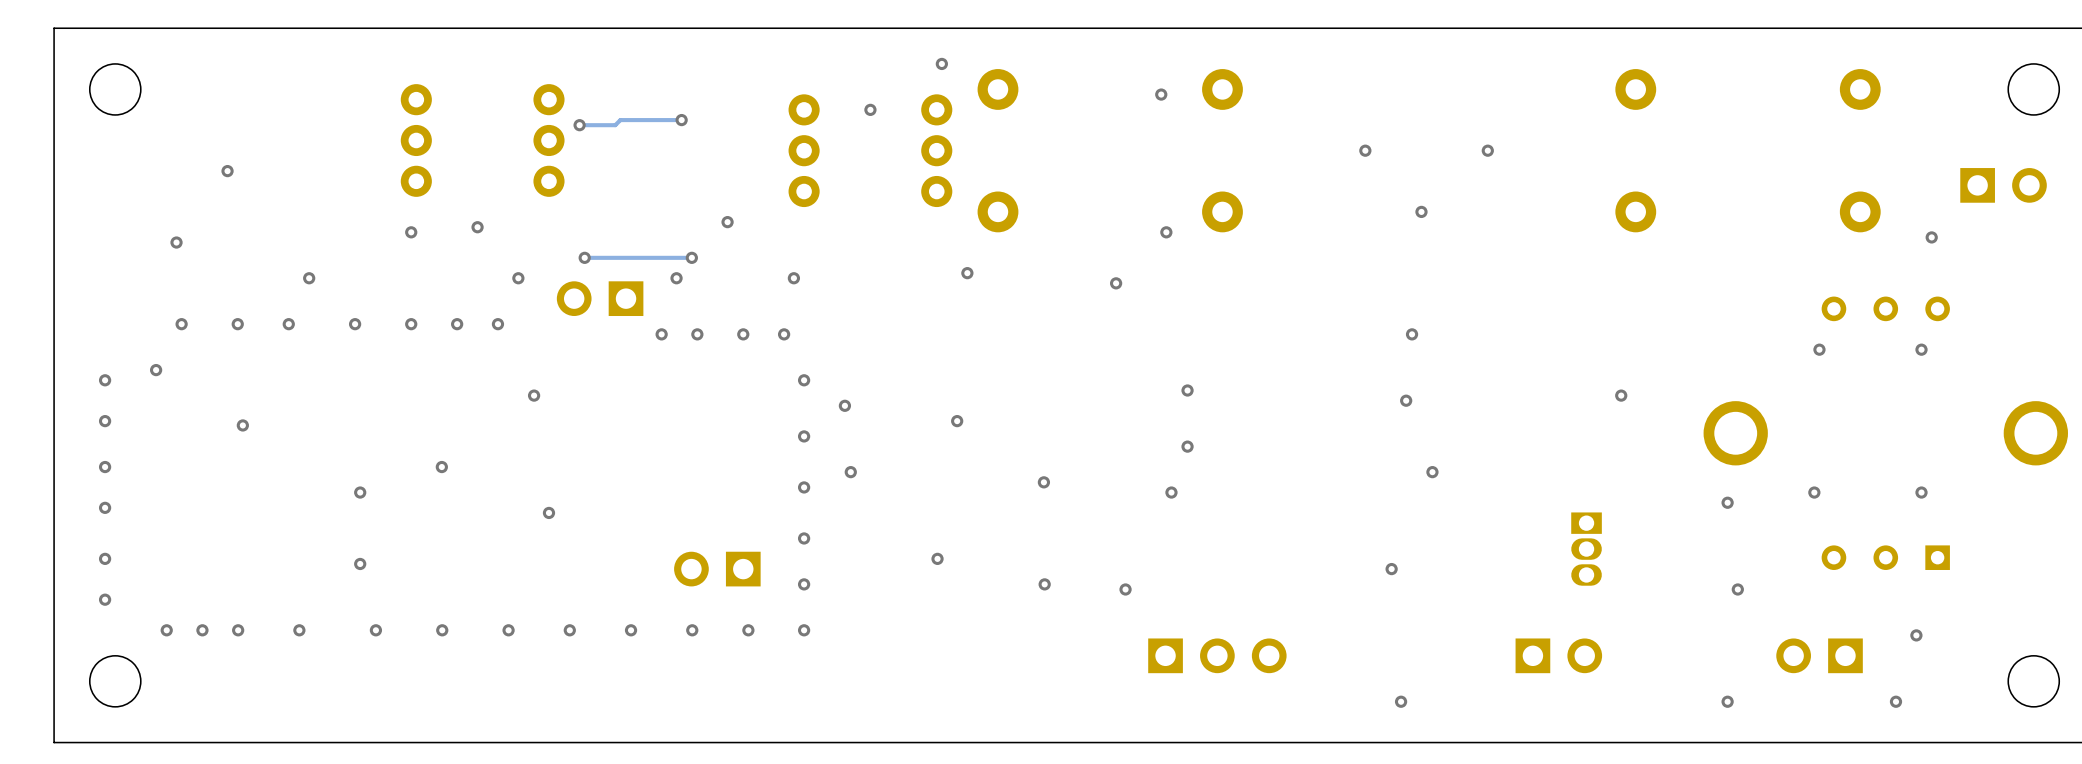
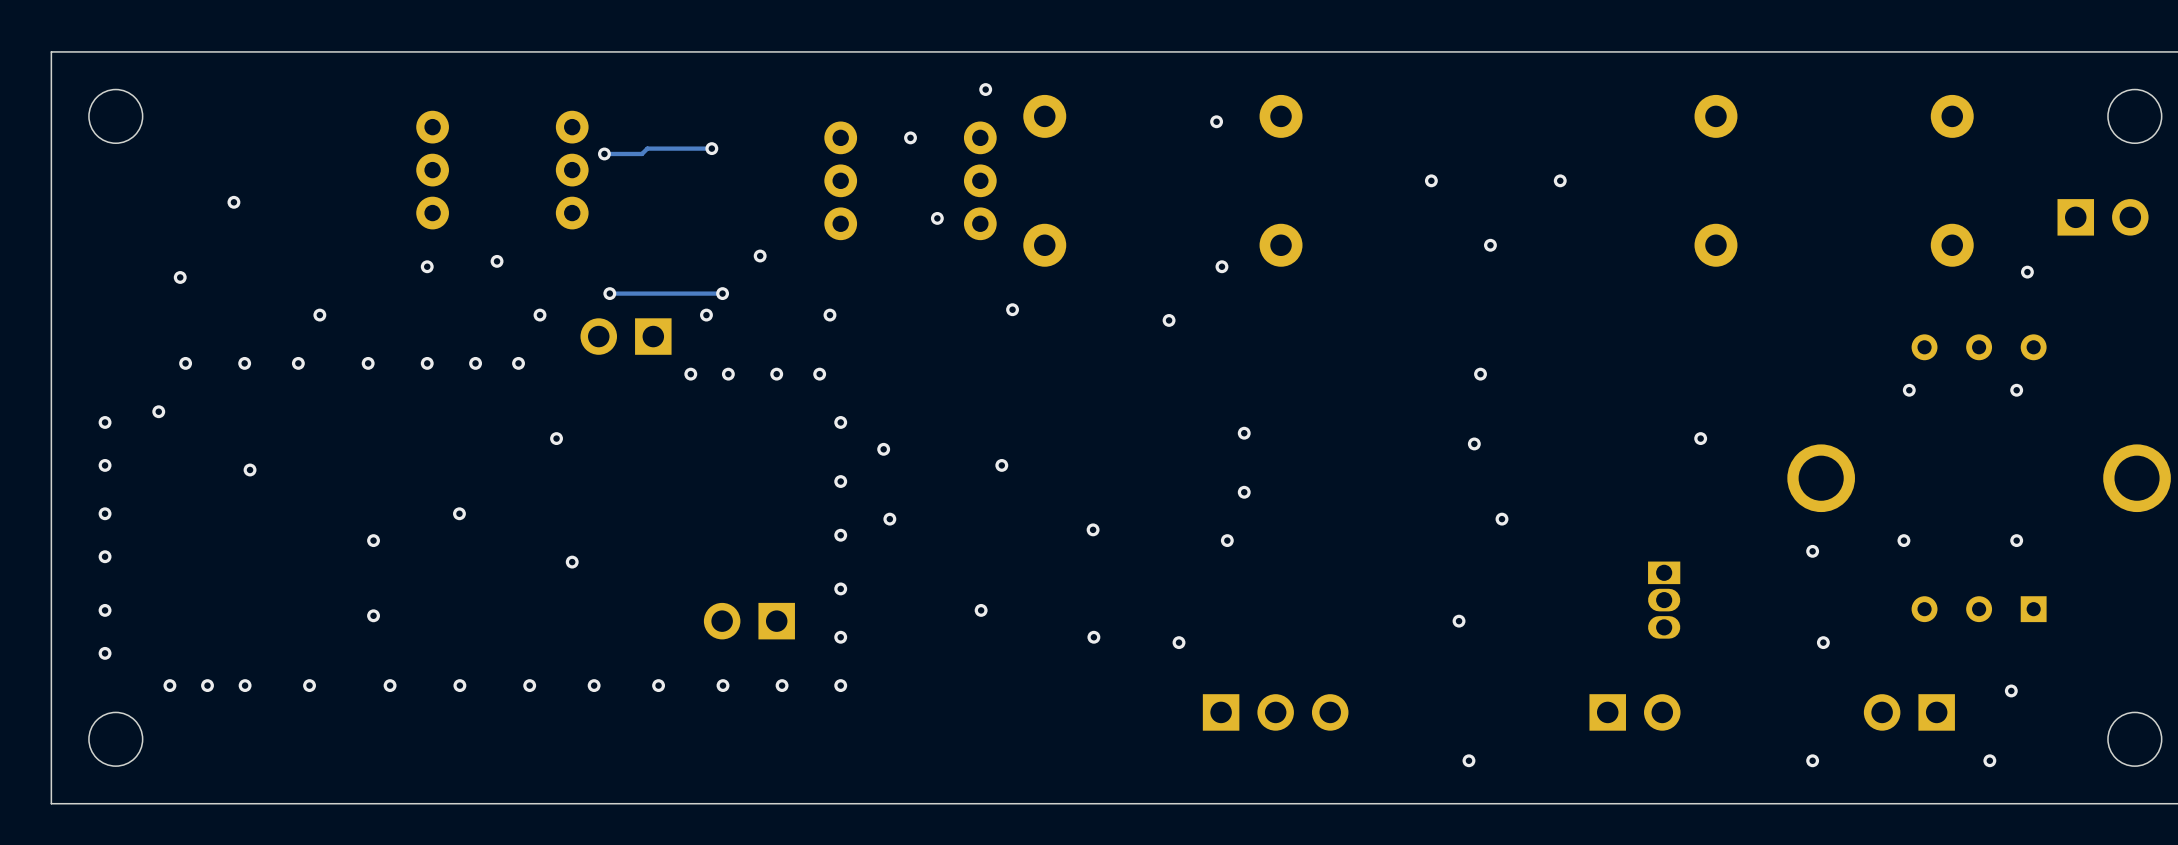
via: none -> (937, 218)

